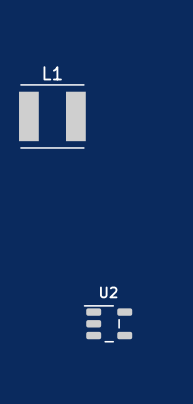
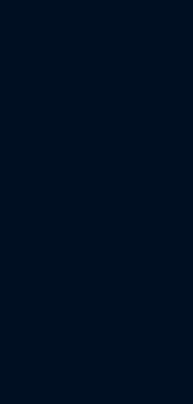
L1: (52, 116) -> none
U2: (107, 323) -> none

